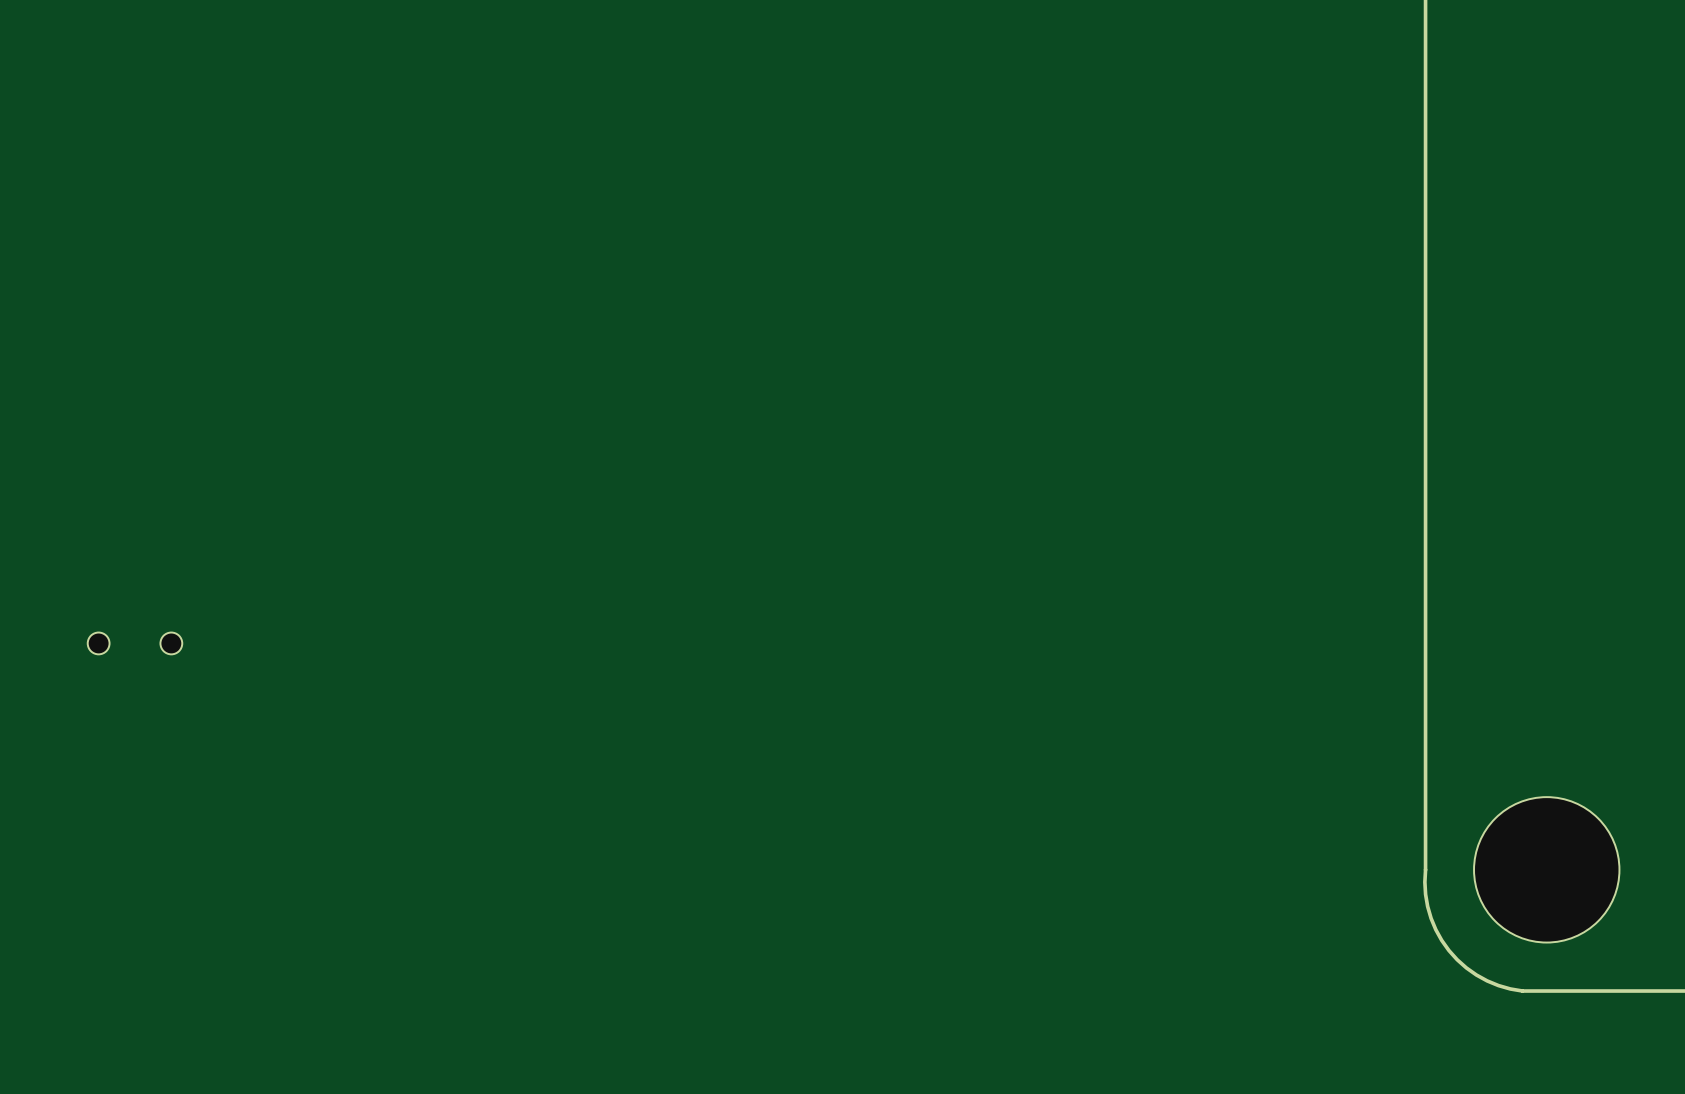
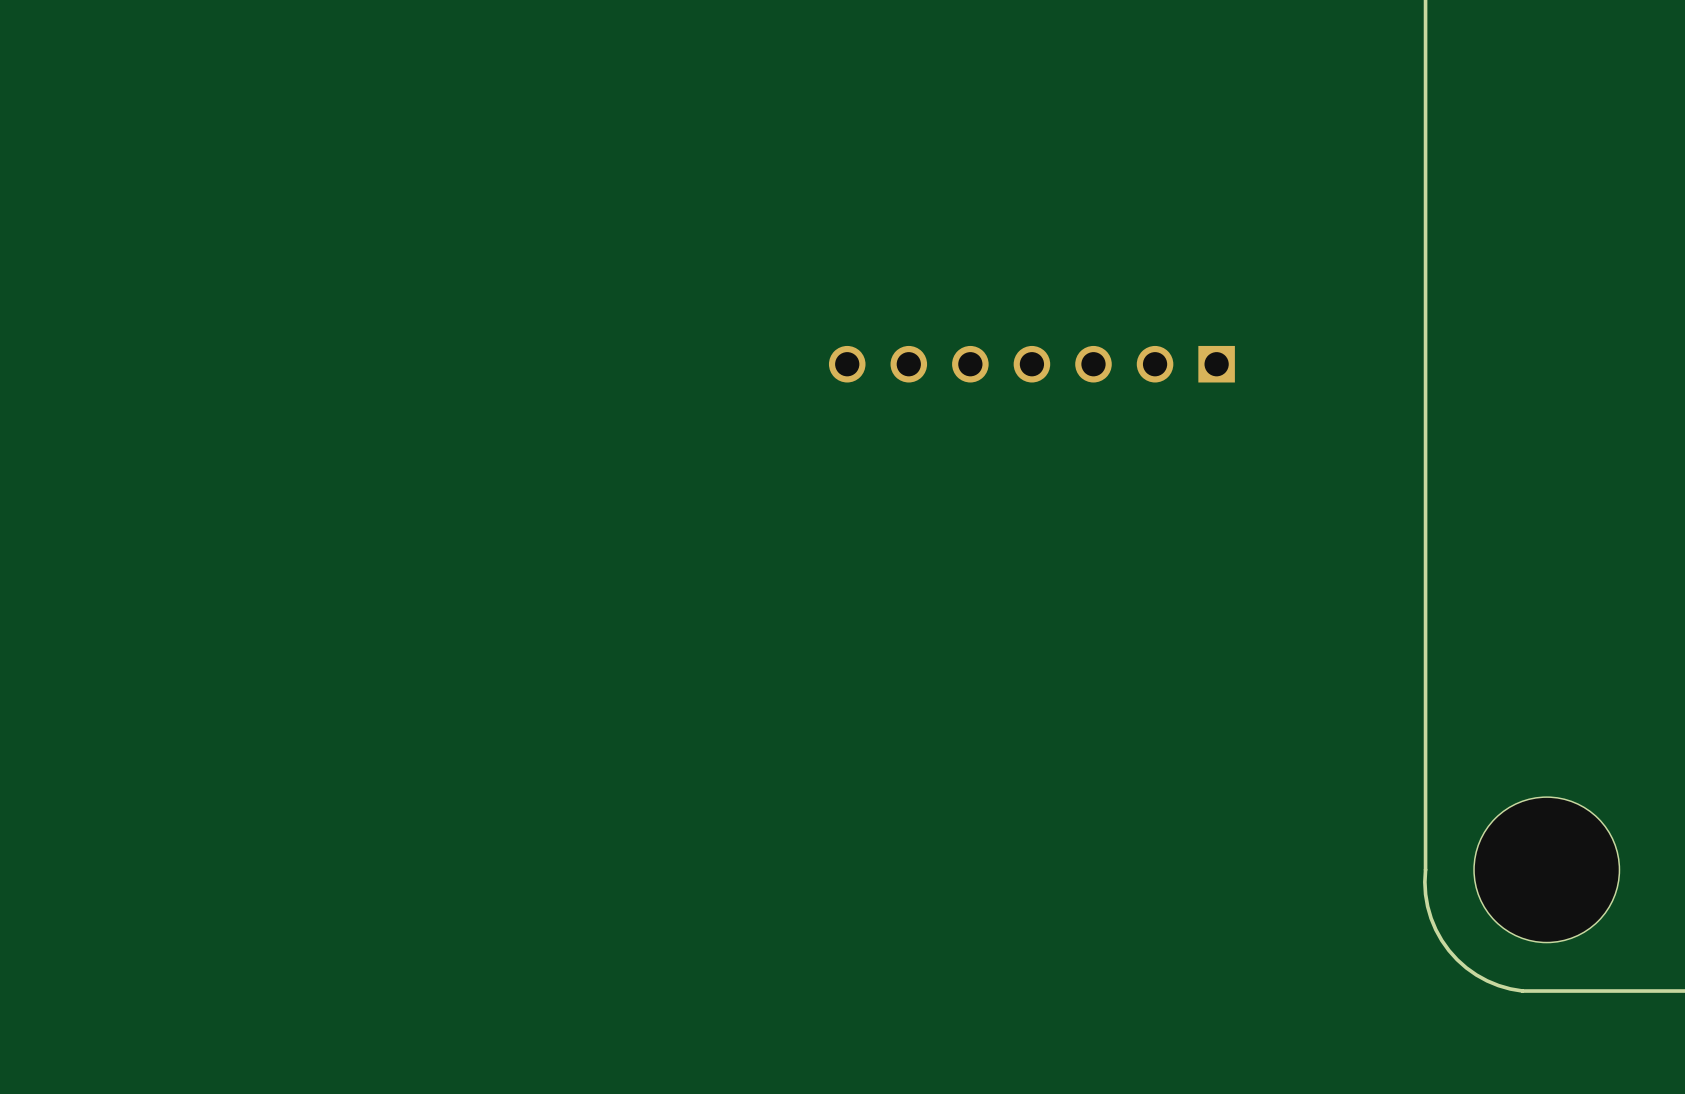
part: none -> (1031, 364)
part: (134, 643) -> none

